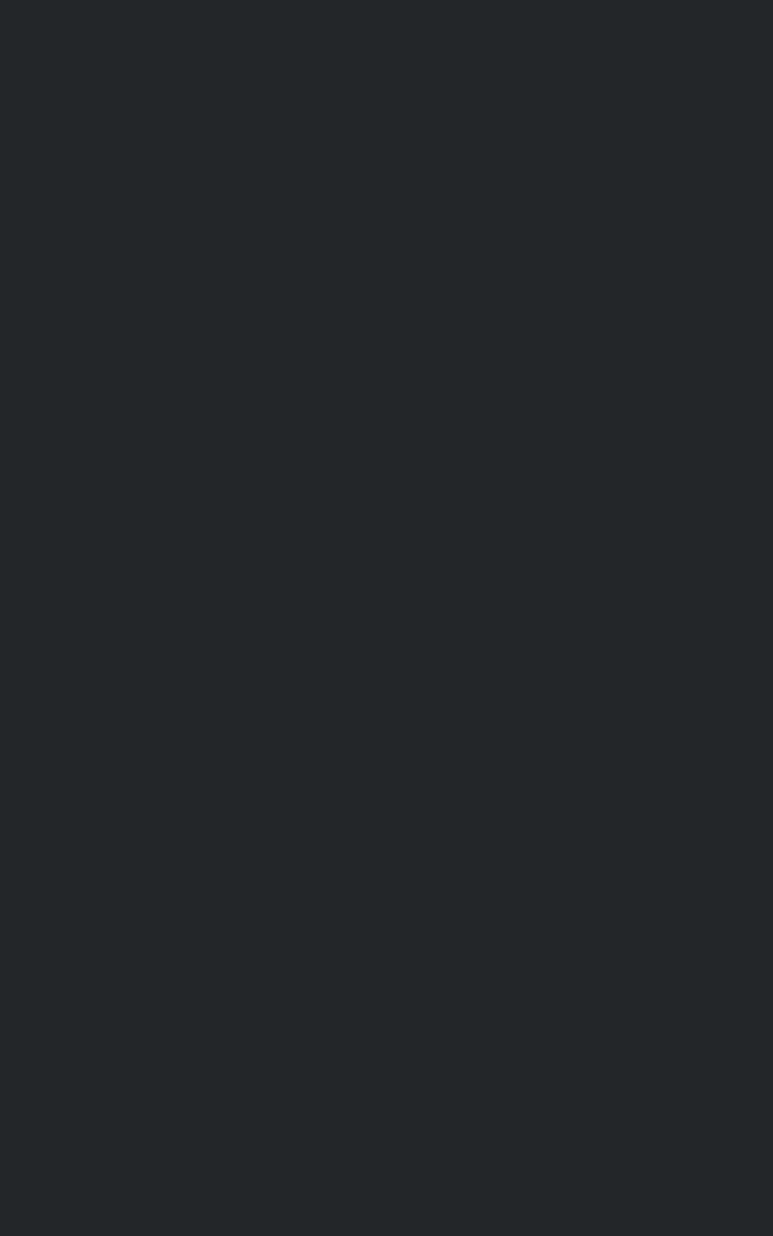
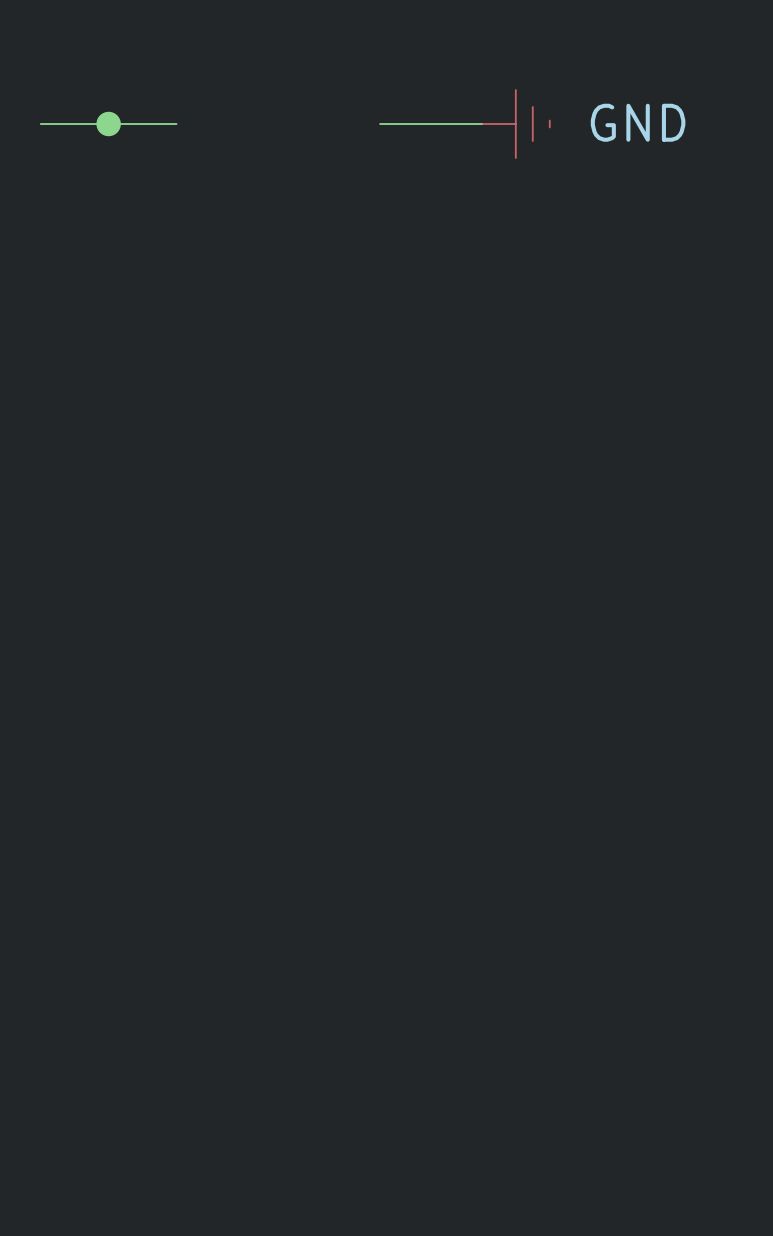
wire: none -> (40, 124) (176, 124)
junction: none -> (108, 124)
wire: none -> (380, 124) (481, 124)
power symbol: none -> GND (515, 124)

